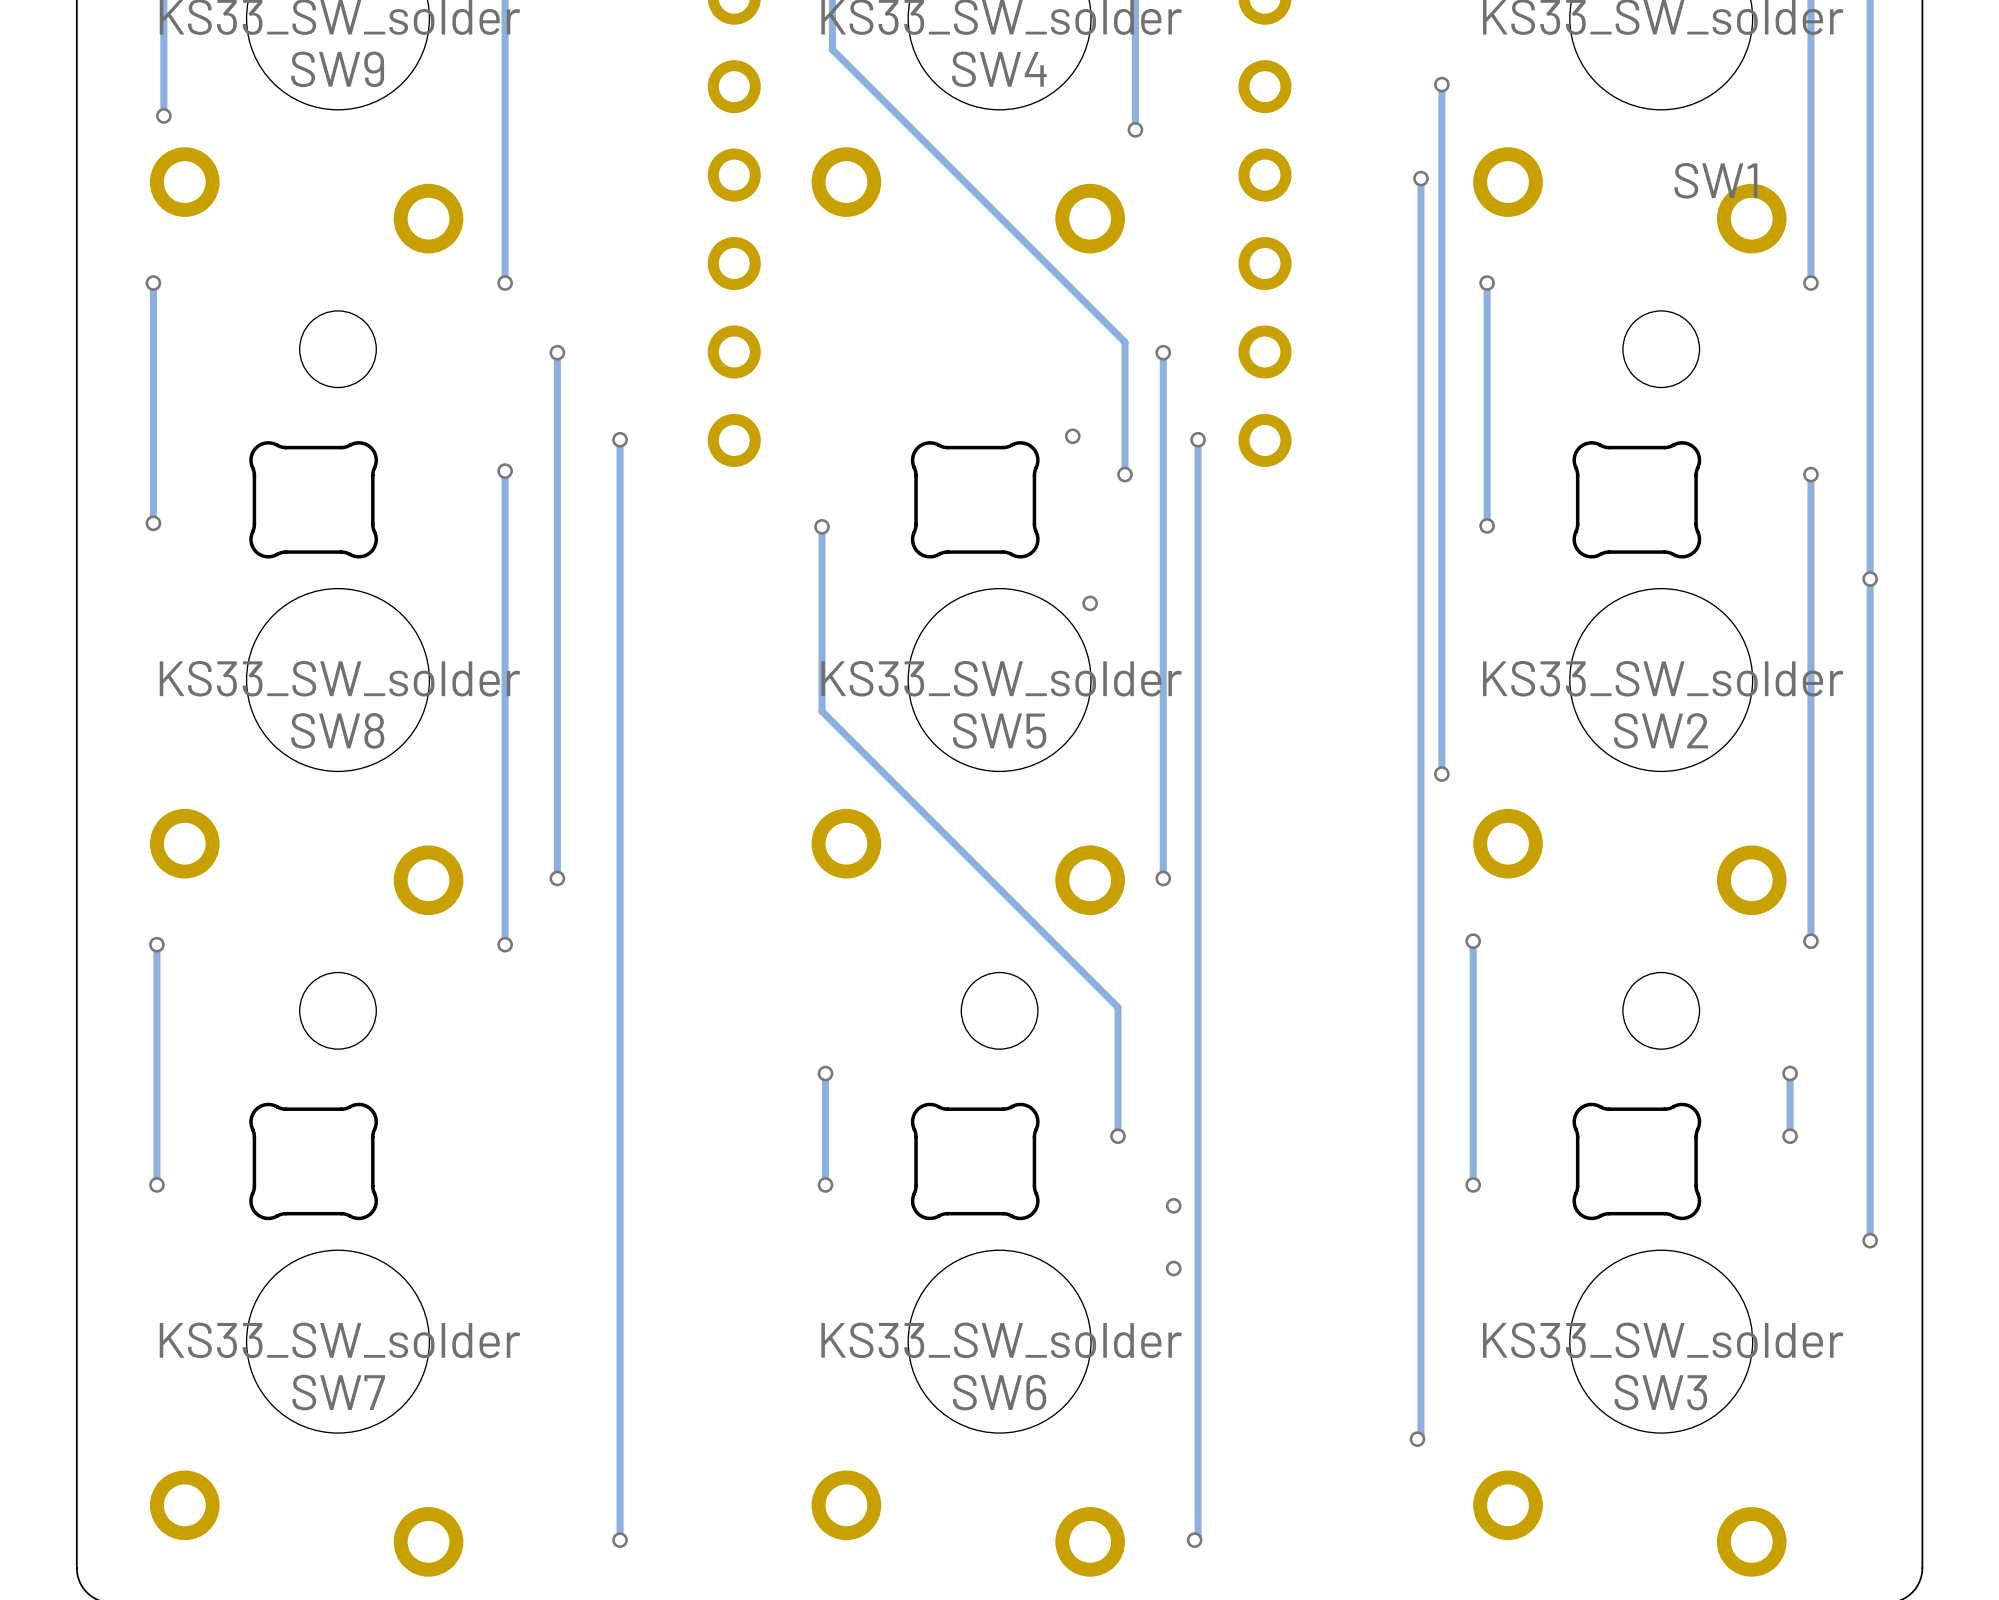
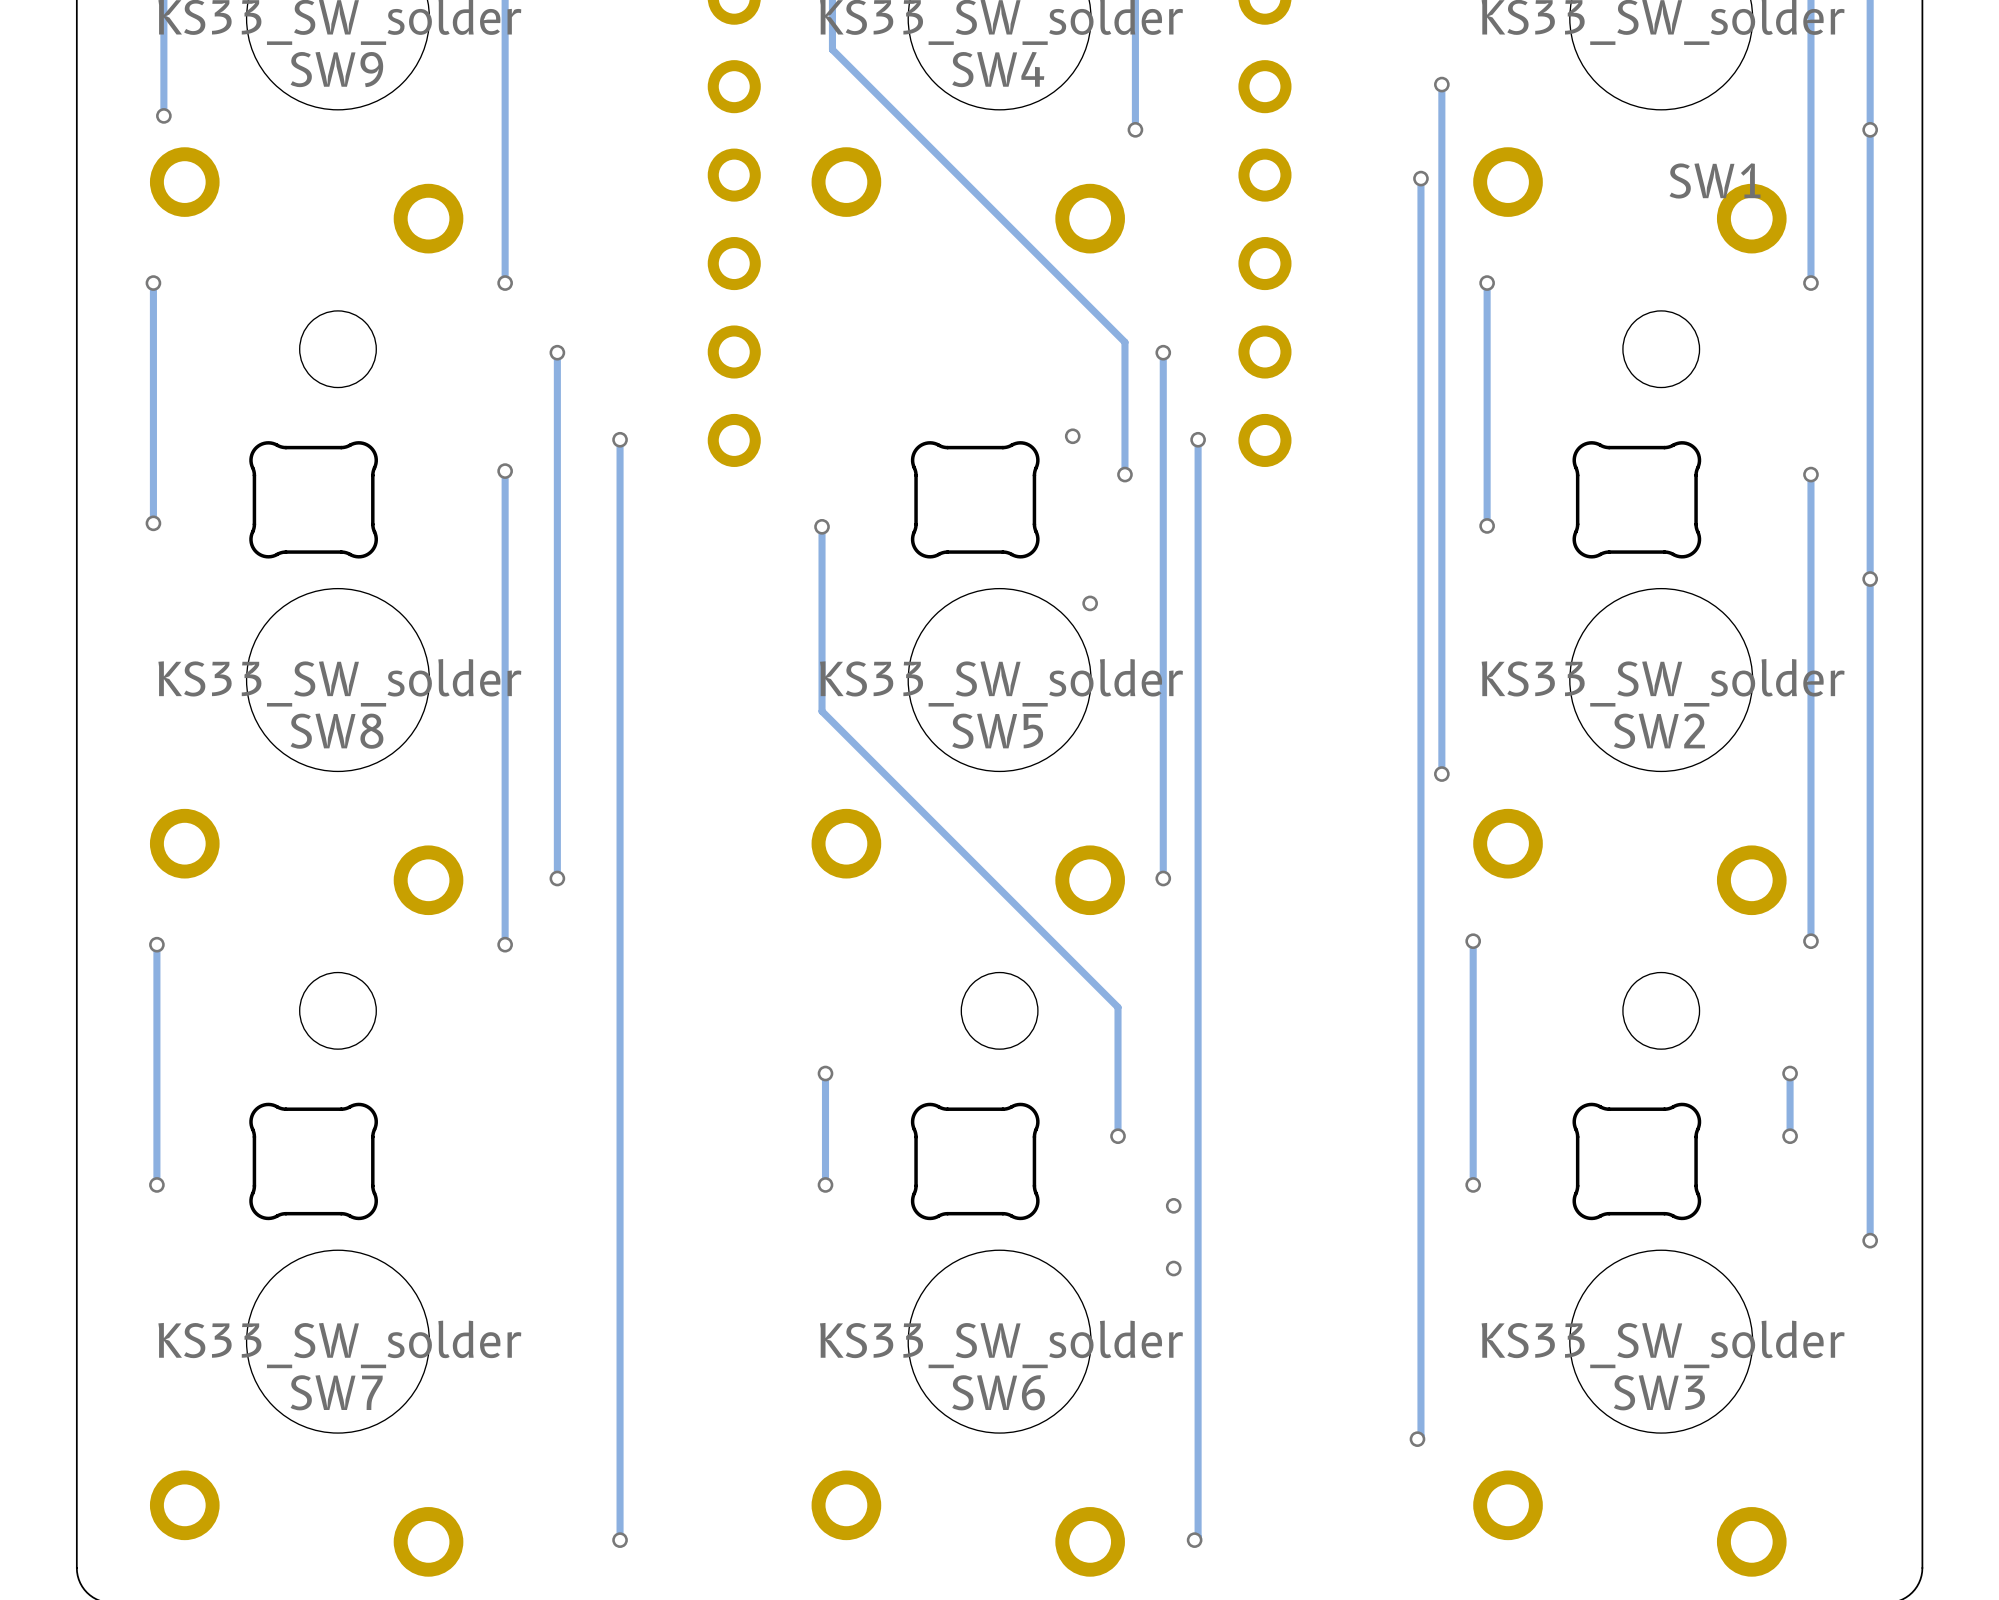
via: none -> (1870, 129)

